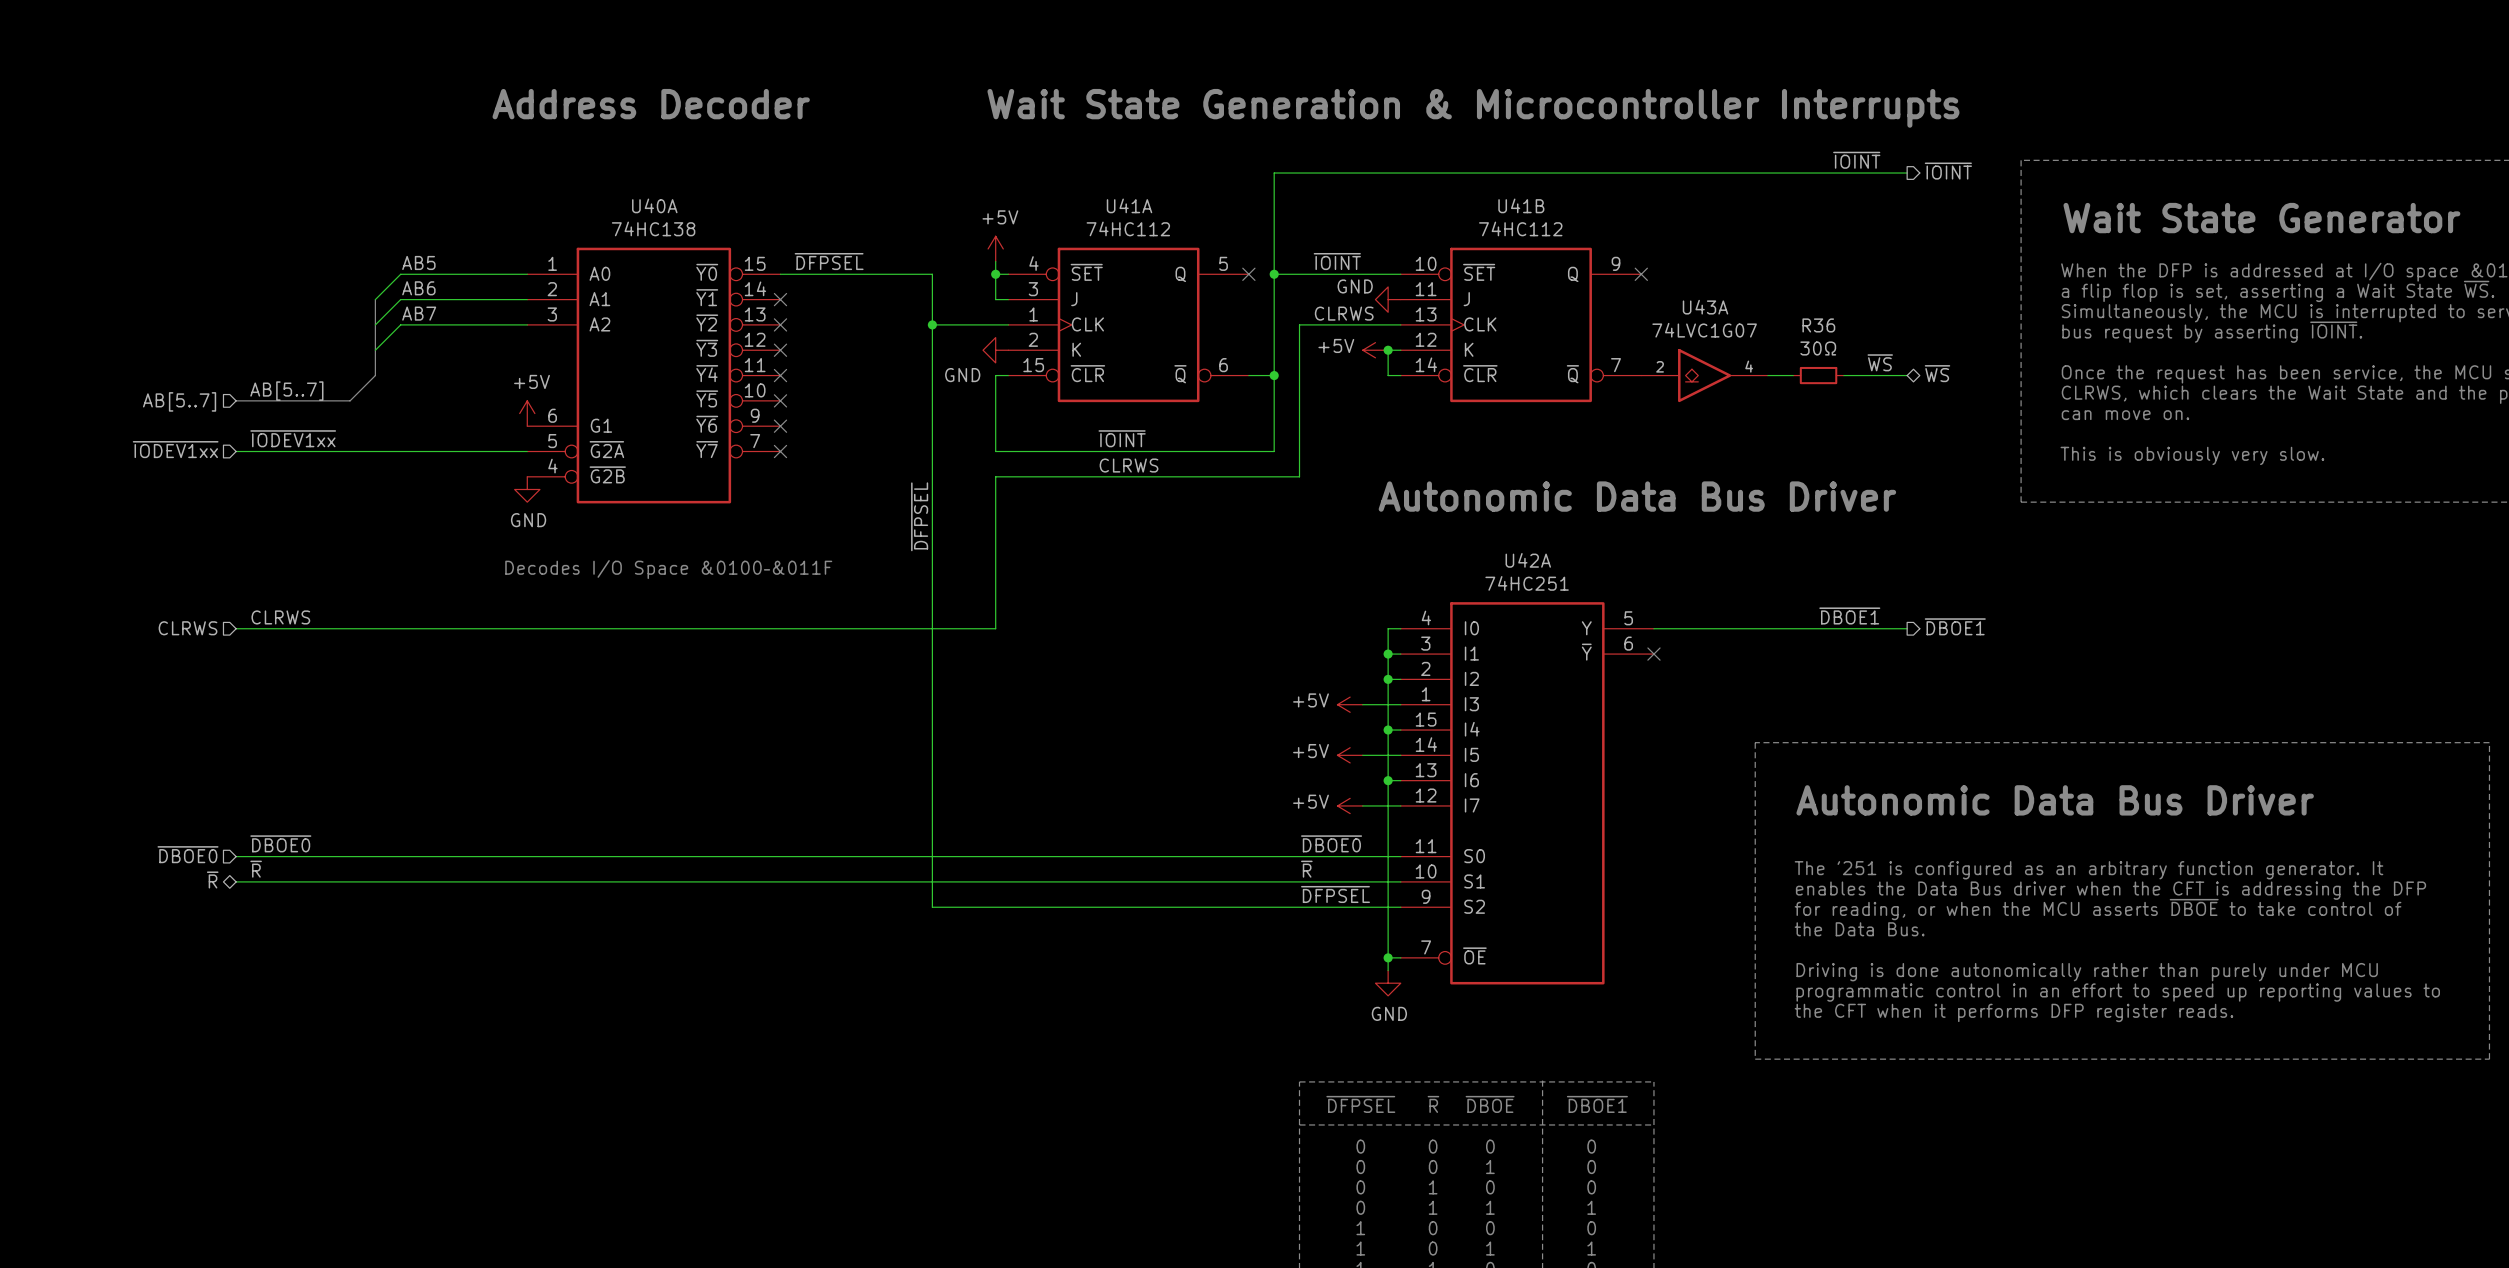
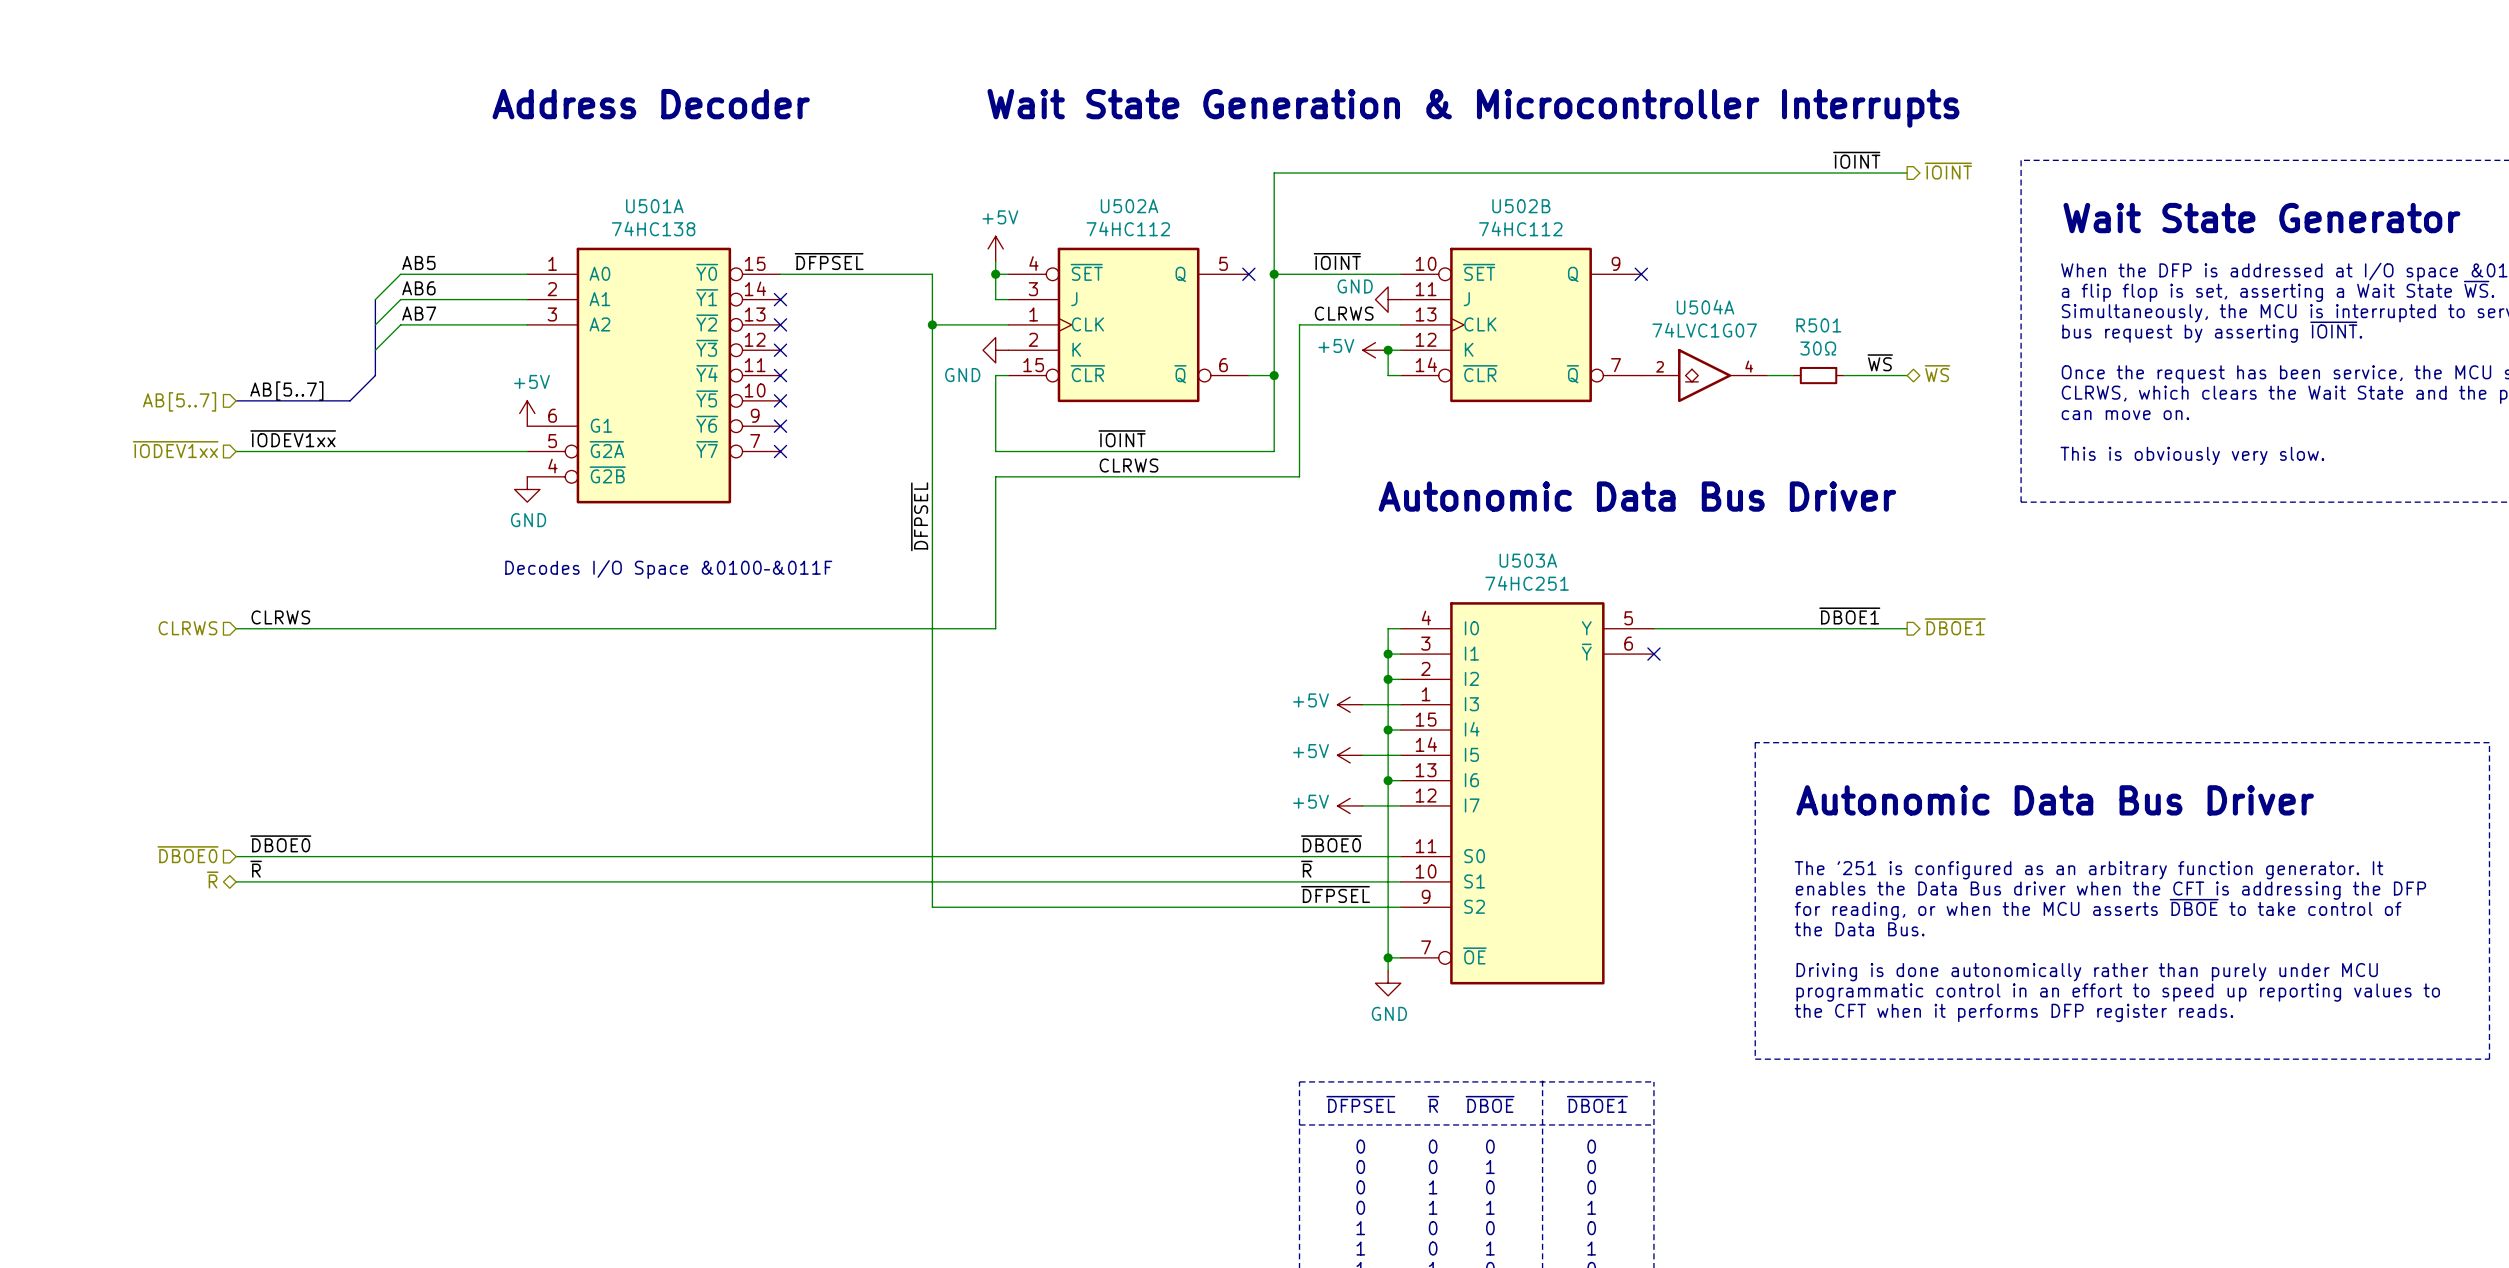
U40A name: U40A (654, 205) -> U501A (654, 206)
U41A name: U41A (1129, 205) -> U502A (1129, 206)
U41B name: U41B (1521, 205) -> U502B (1521, 206)
U43A name: U43A (1705, 307) -> U504A (1705, 307)
R36 name: R36 (1818, 325) -> R501 (1818, 325)
U42A name: U42A (1528, 560) -> U503A (1528, 560)

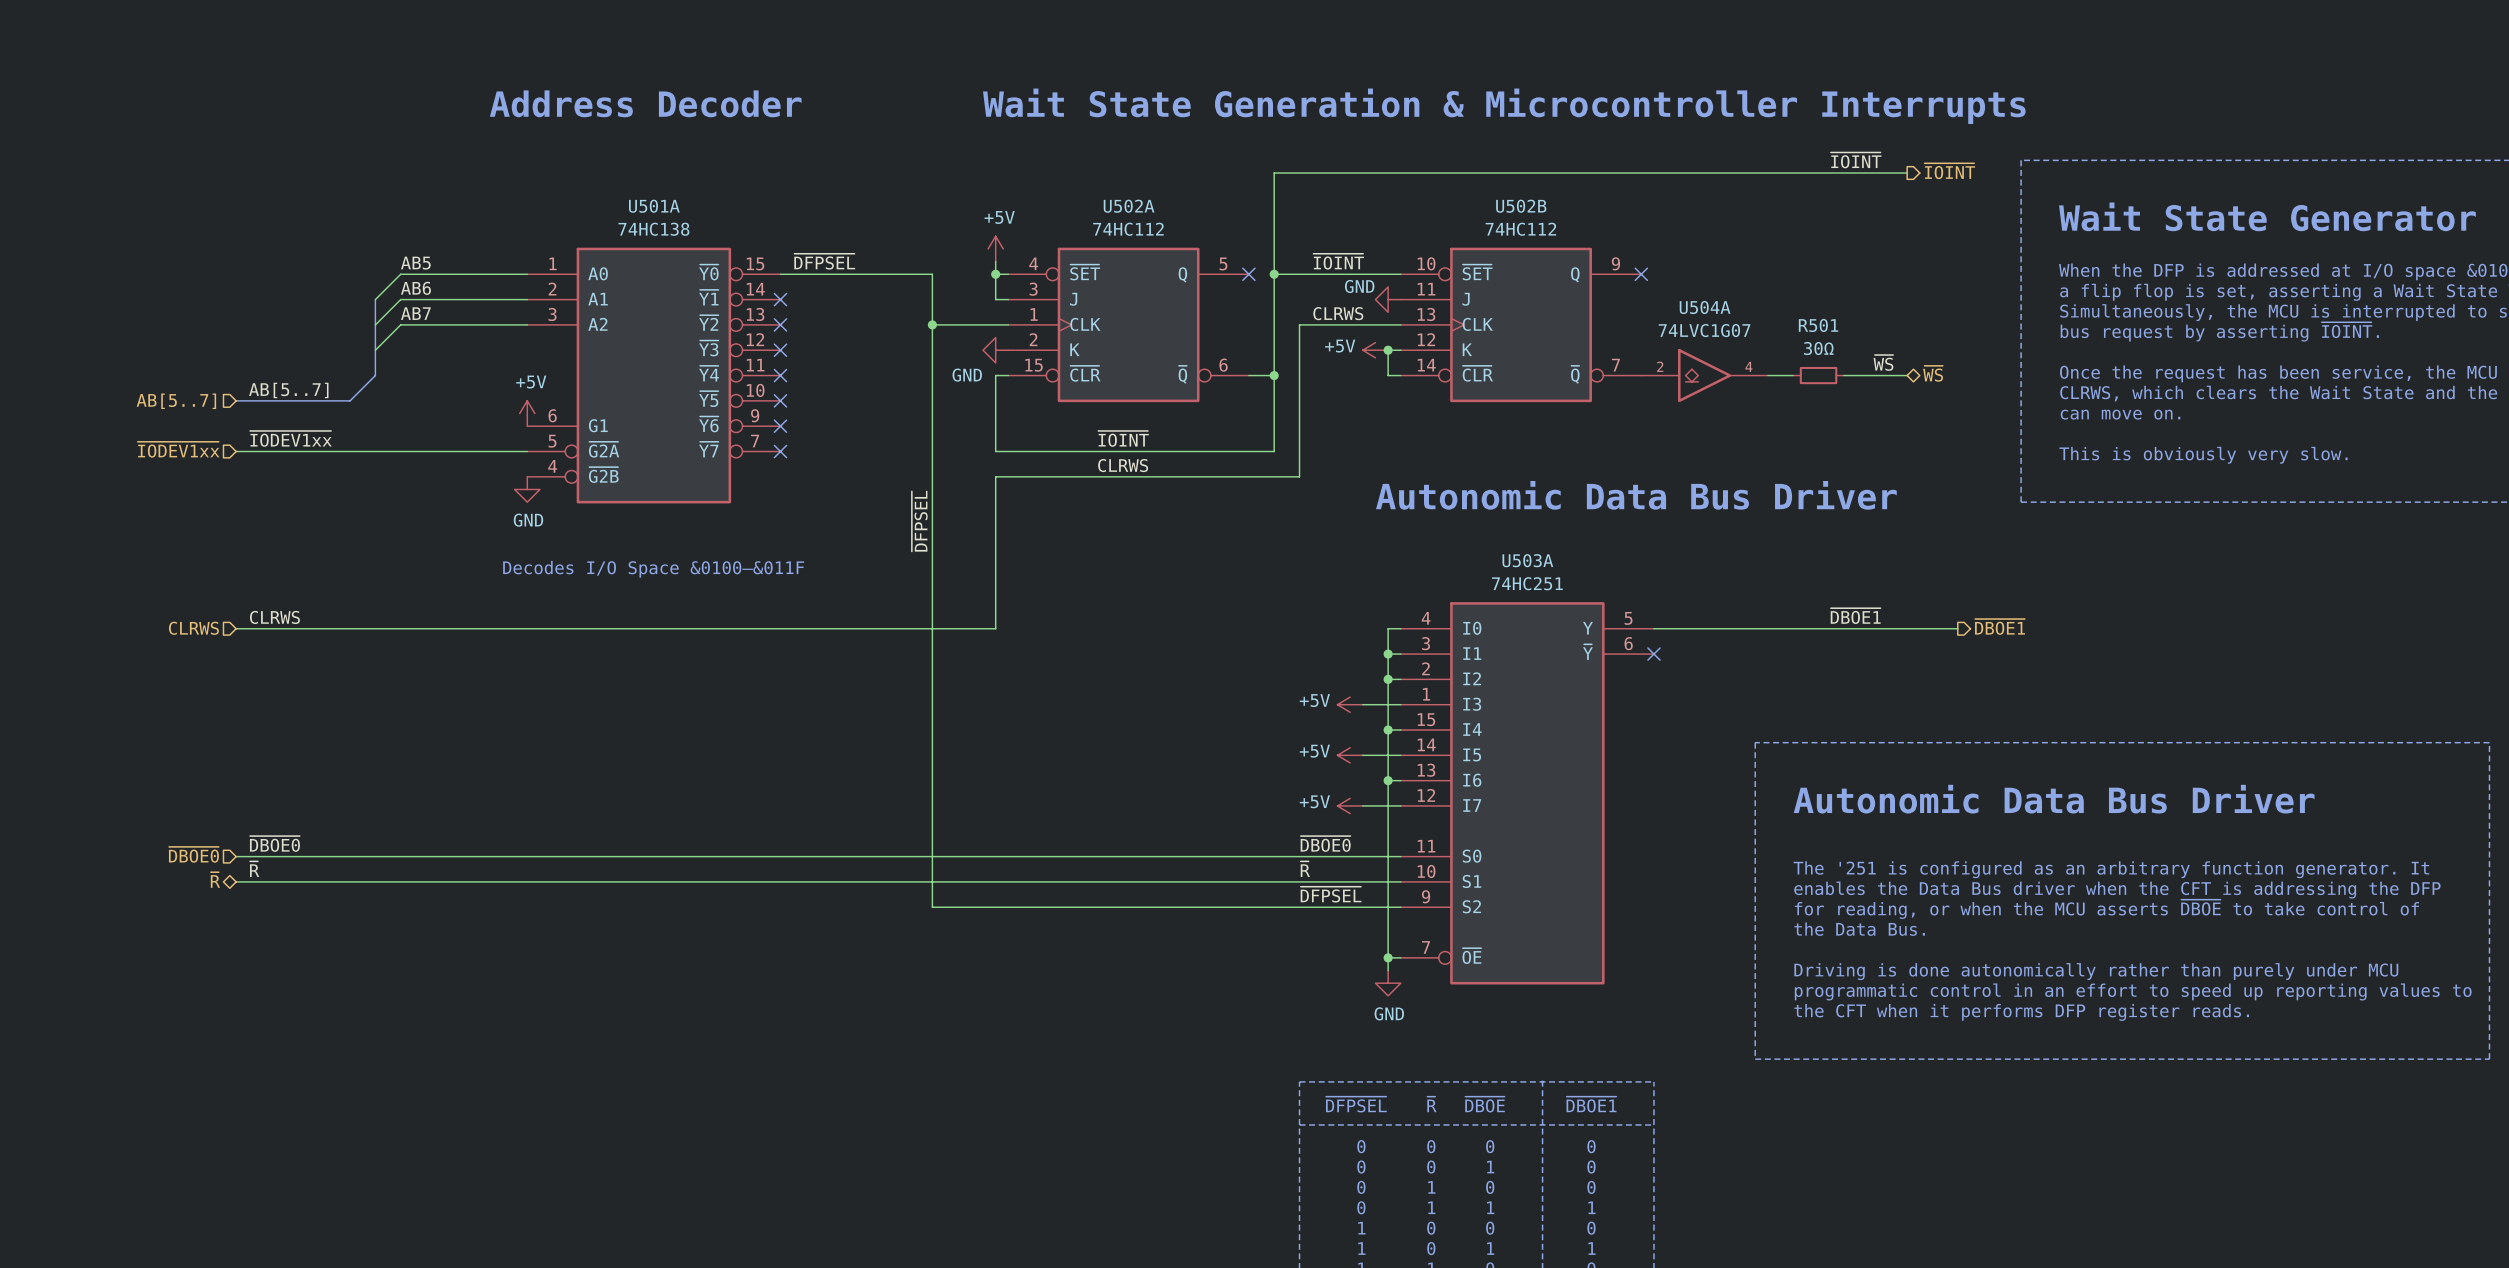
hierarchical label position: ~{DBOE1} (1955, 626) -> ~{DBOE1} (1999, 626)
wire: none -> (1907, 628) (1957, 628)

